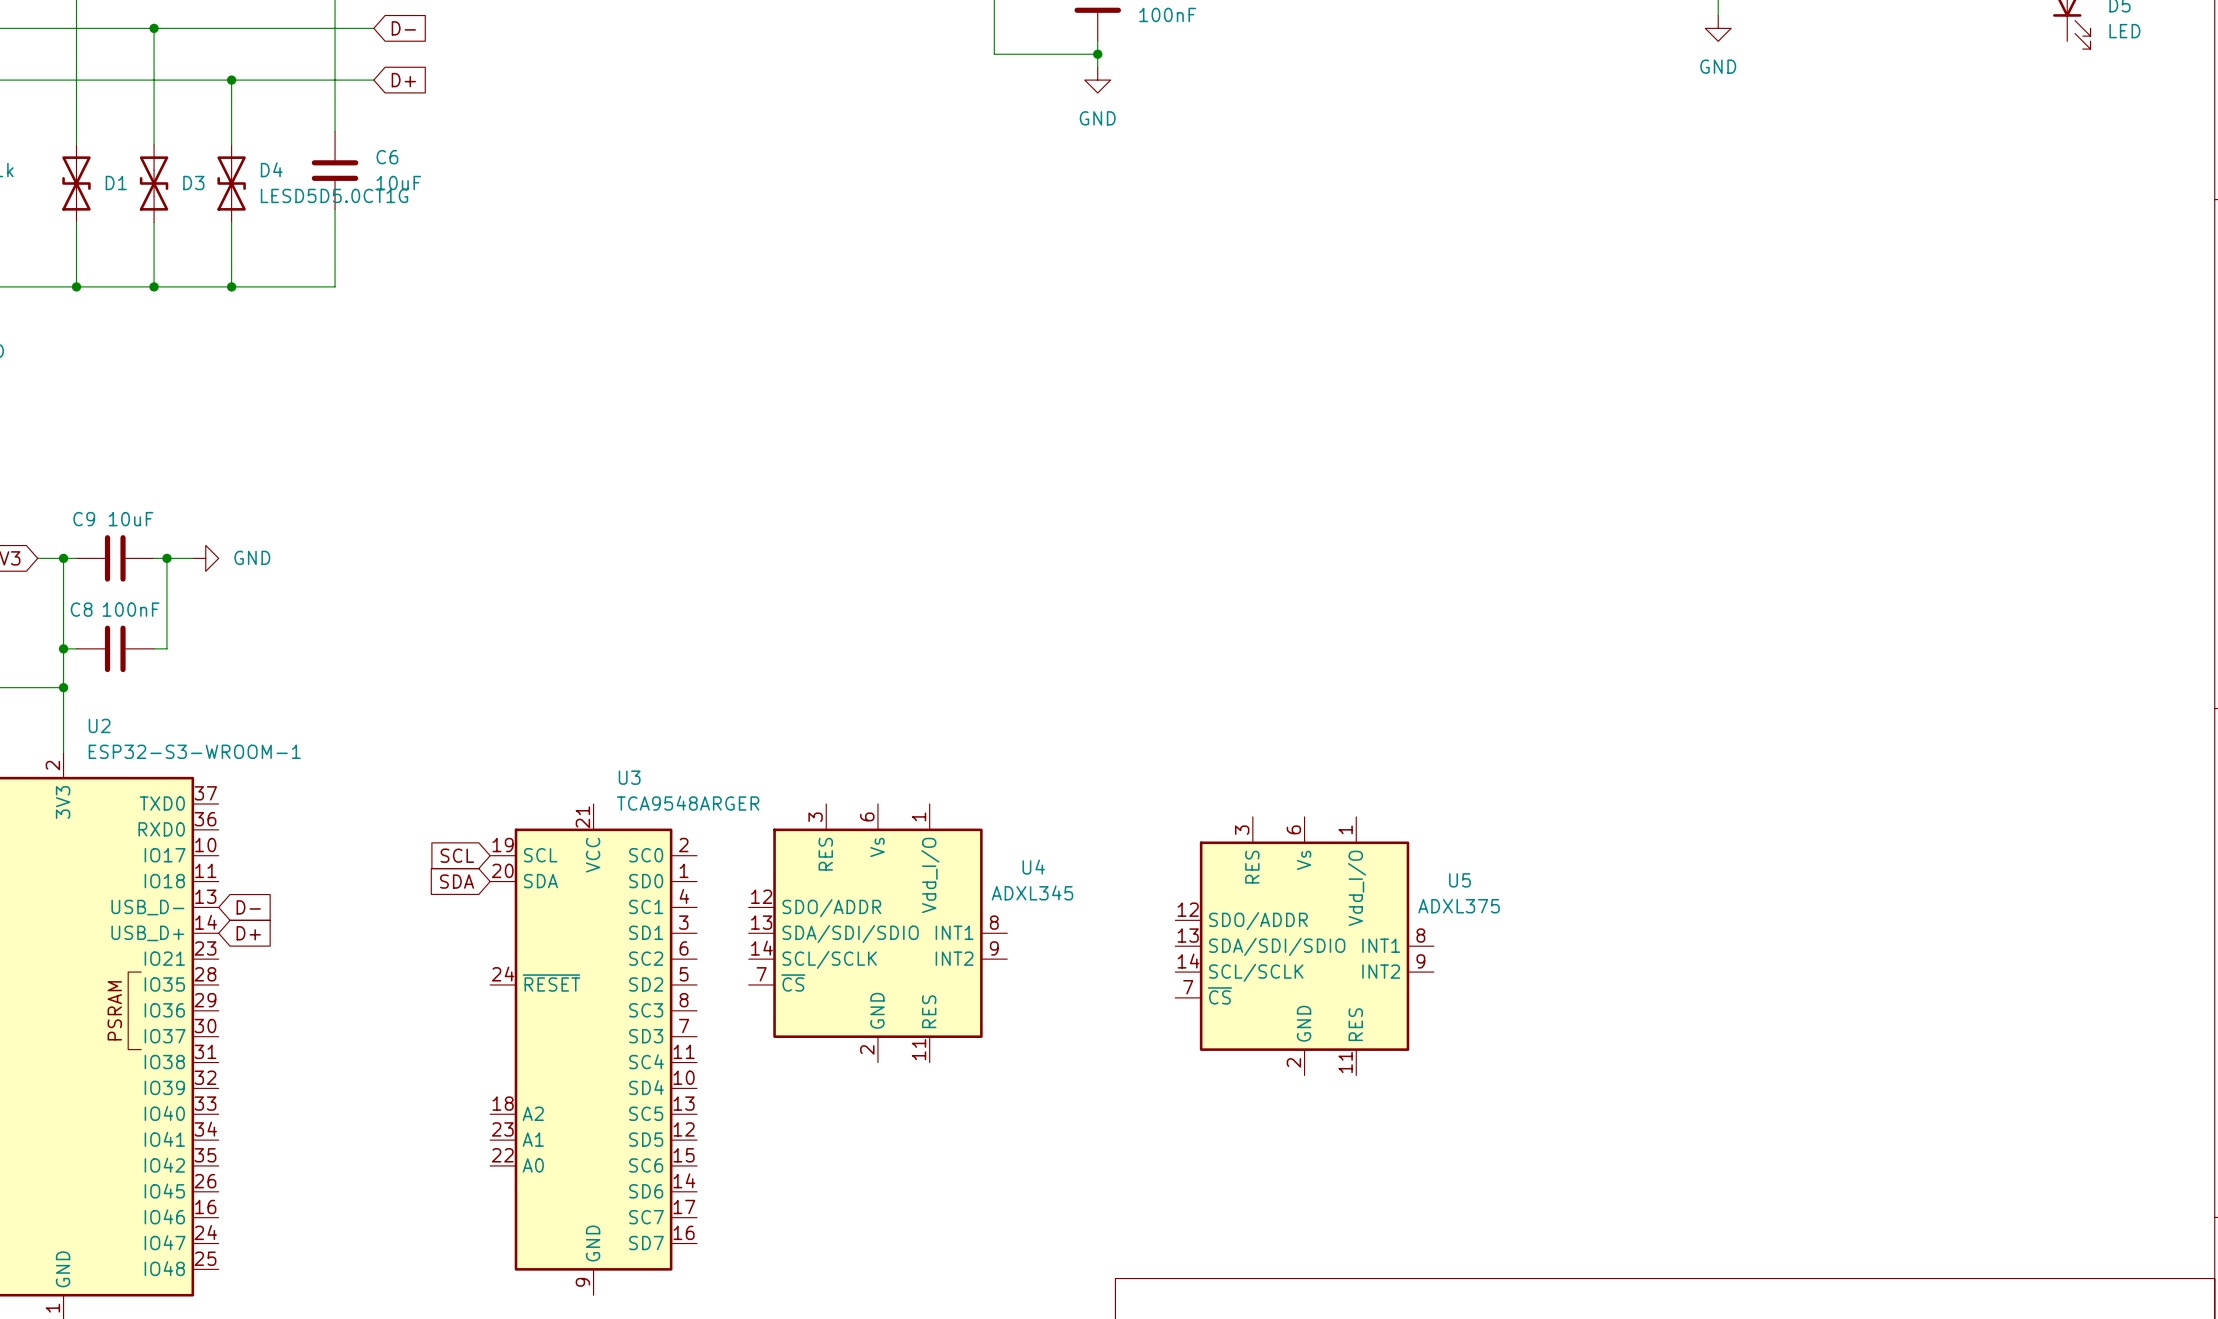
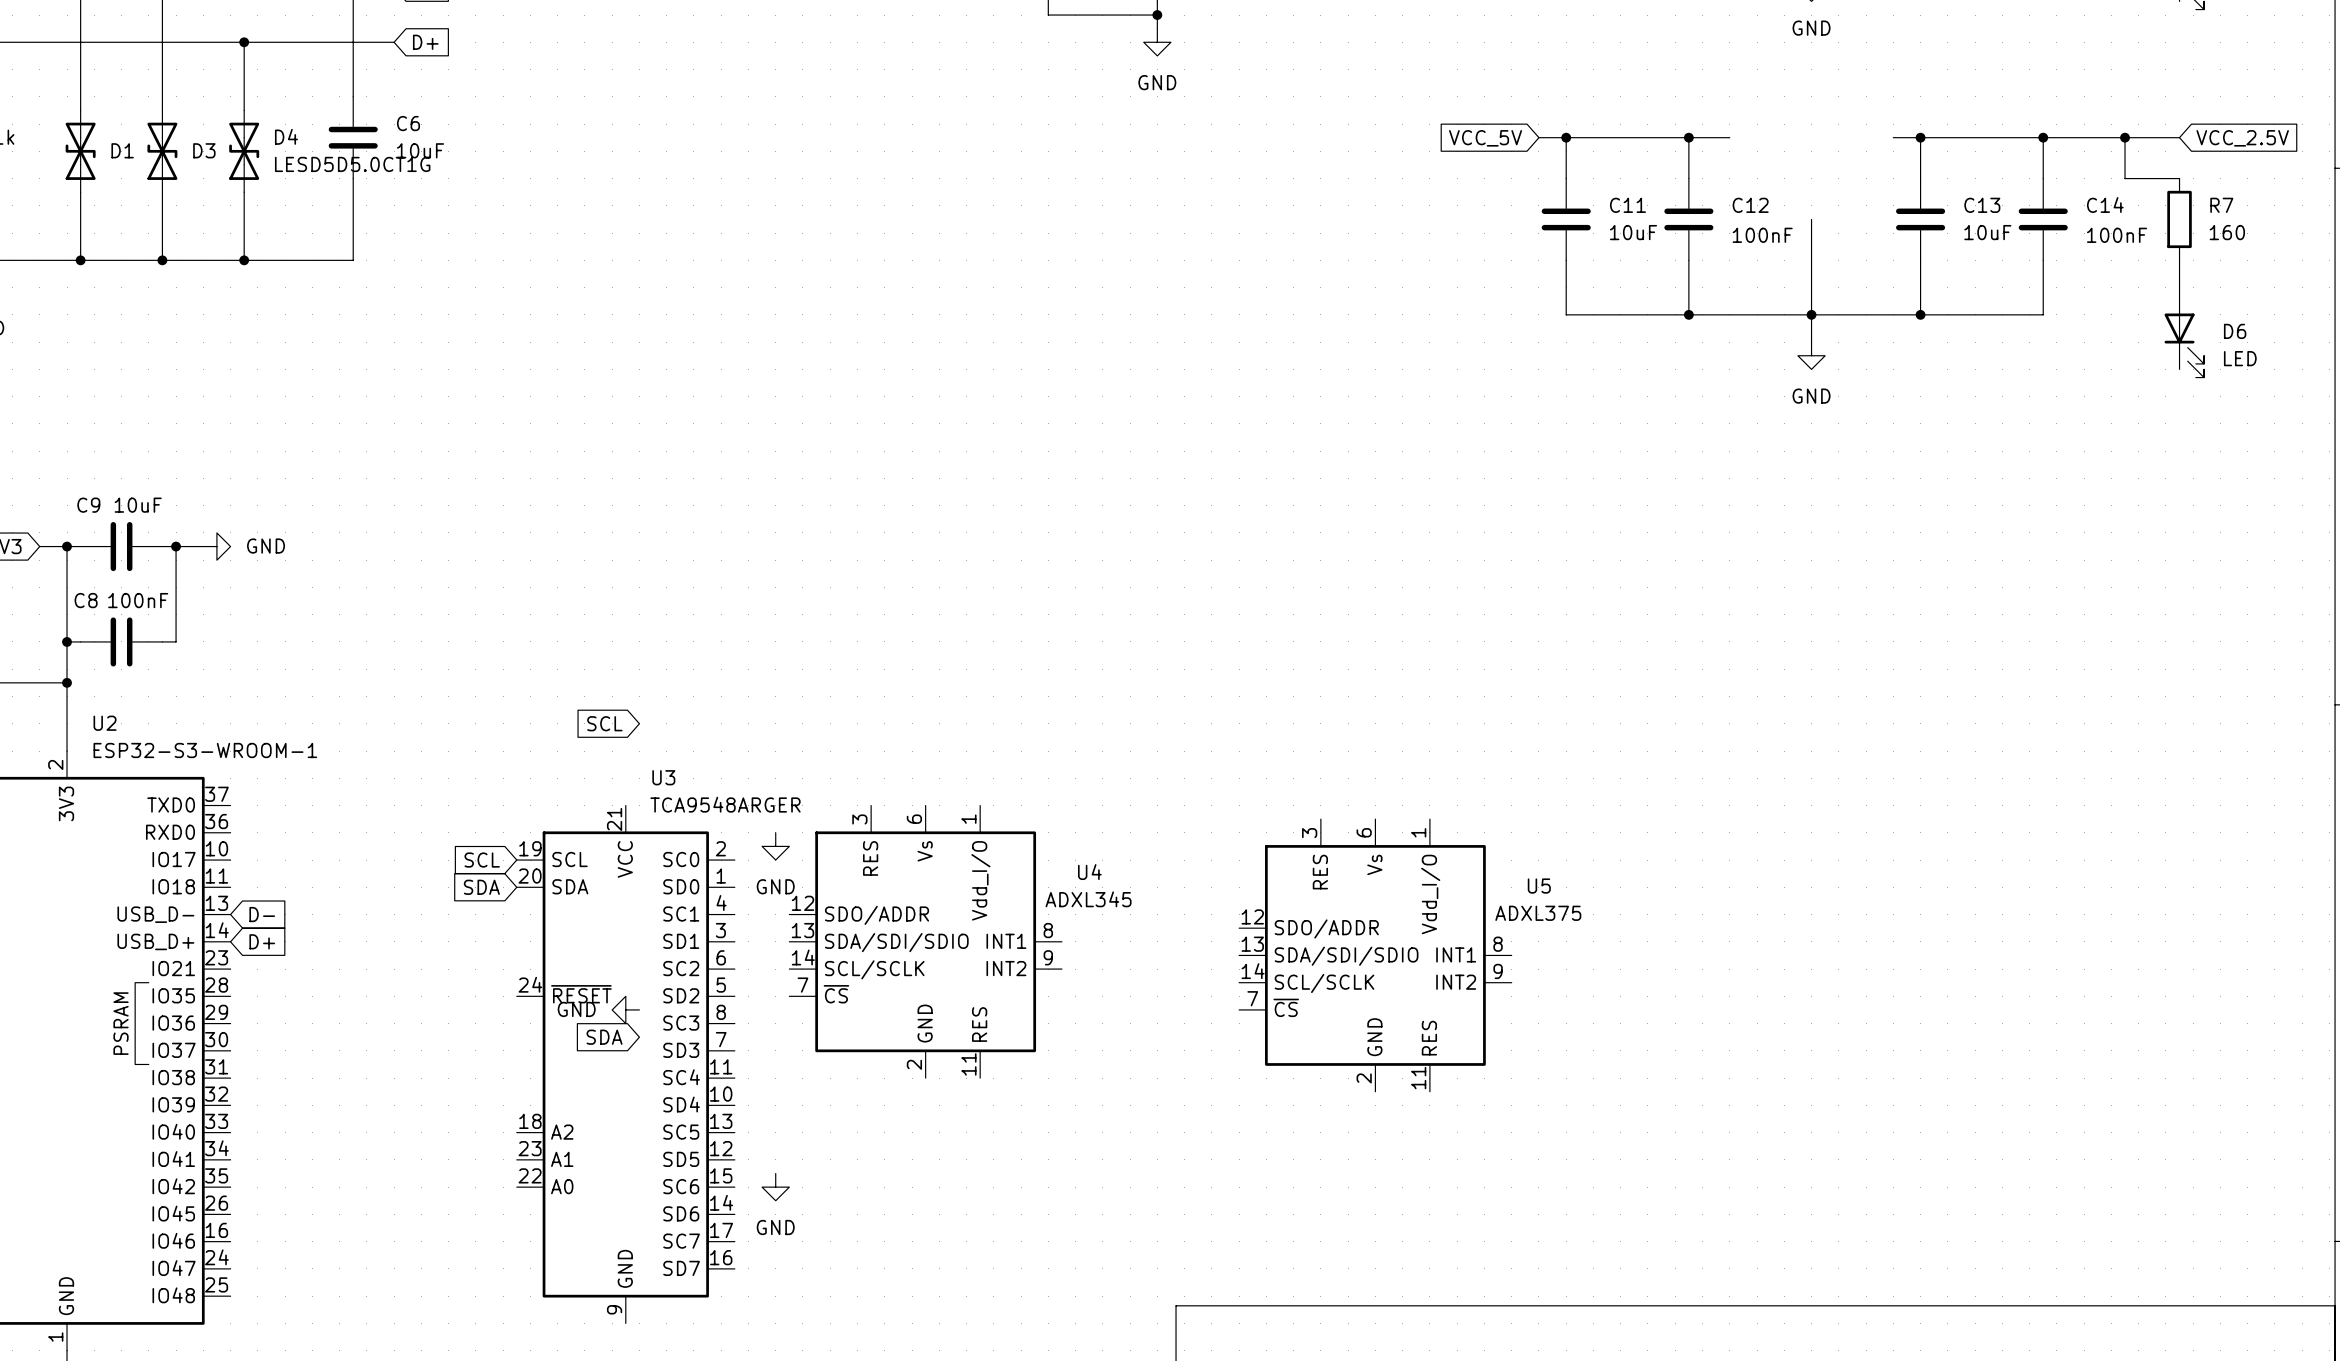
wire: none -> (1538, 137) (1729, 137)
wire: none -> (1566, 137) (1566, 178)
junction: none -> (1566, 137)
wire: none -> (1688, 137) (1688, 178)
junction: none -> (1688, 137)
wire: none -> (1893, 137) (2179, 137)
wire: none -> (1920, 137) (1920, 178)
junction: none -> (1920, 137)
wire: none -> (2043, 137) (2043, 178)
junction: none -> (2043, 137)
wire: none -> (2125, 137) (2125, 178) (2179, 178)
junction: none -> (2125, 137)
global label: none -> VCC_5V (1485, 138)
global label: none -> VCC_2.5V (2242, 138)
C11: none -> 10uF (1566, 219)
C12: none -> 100nF (1688, 219)
wire: none -> (1811, 219) (1811, 342)
C13: none -> 10uF (1920, 219)
C14: none -> 100nF (2043, 219)
R7: none -> 160 (2179, 219)
wire: none -> (1566, 260) (1566, 314) (2043, 314) (2043, 260)
wire: none -> (1688, 260) (1688, 314)
wire: none -> (1920, 260) (1920, 314)
wire: none -> (2179, 260) (2179, 287)
junction: none -> (1688, 314)
junction: none -> (1811, 314)
junction: none -> (1920, 314)
D6: none -> LED (2184, 332)
power symbol: none -> GND (1811, 355)
global label: none -> SCL (604, 723)
power symbol: none -> GND (775, 846)
power symbol: none -> GND (625, 1009)
global label: none -> SDA (604, 1037)
power symbol: none -> GND (775, 1187)

